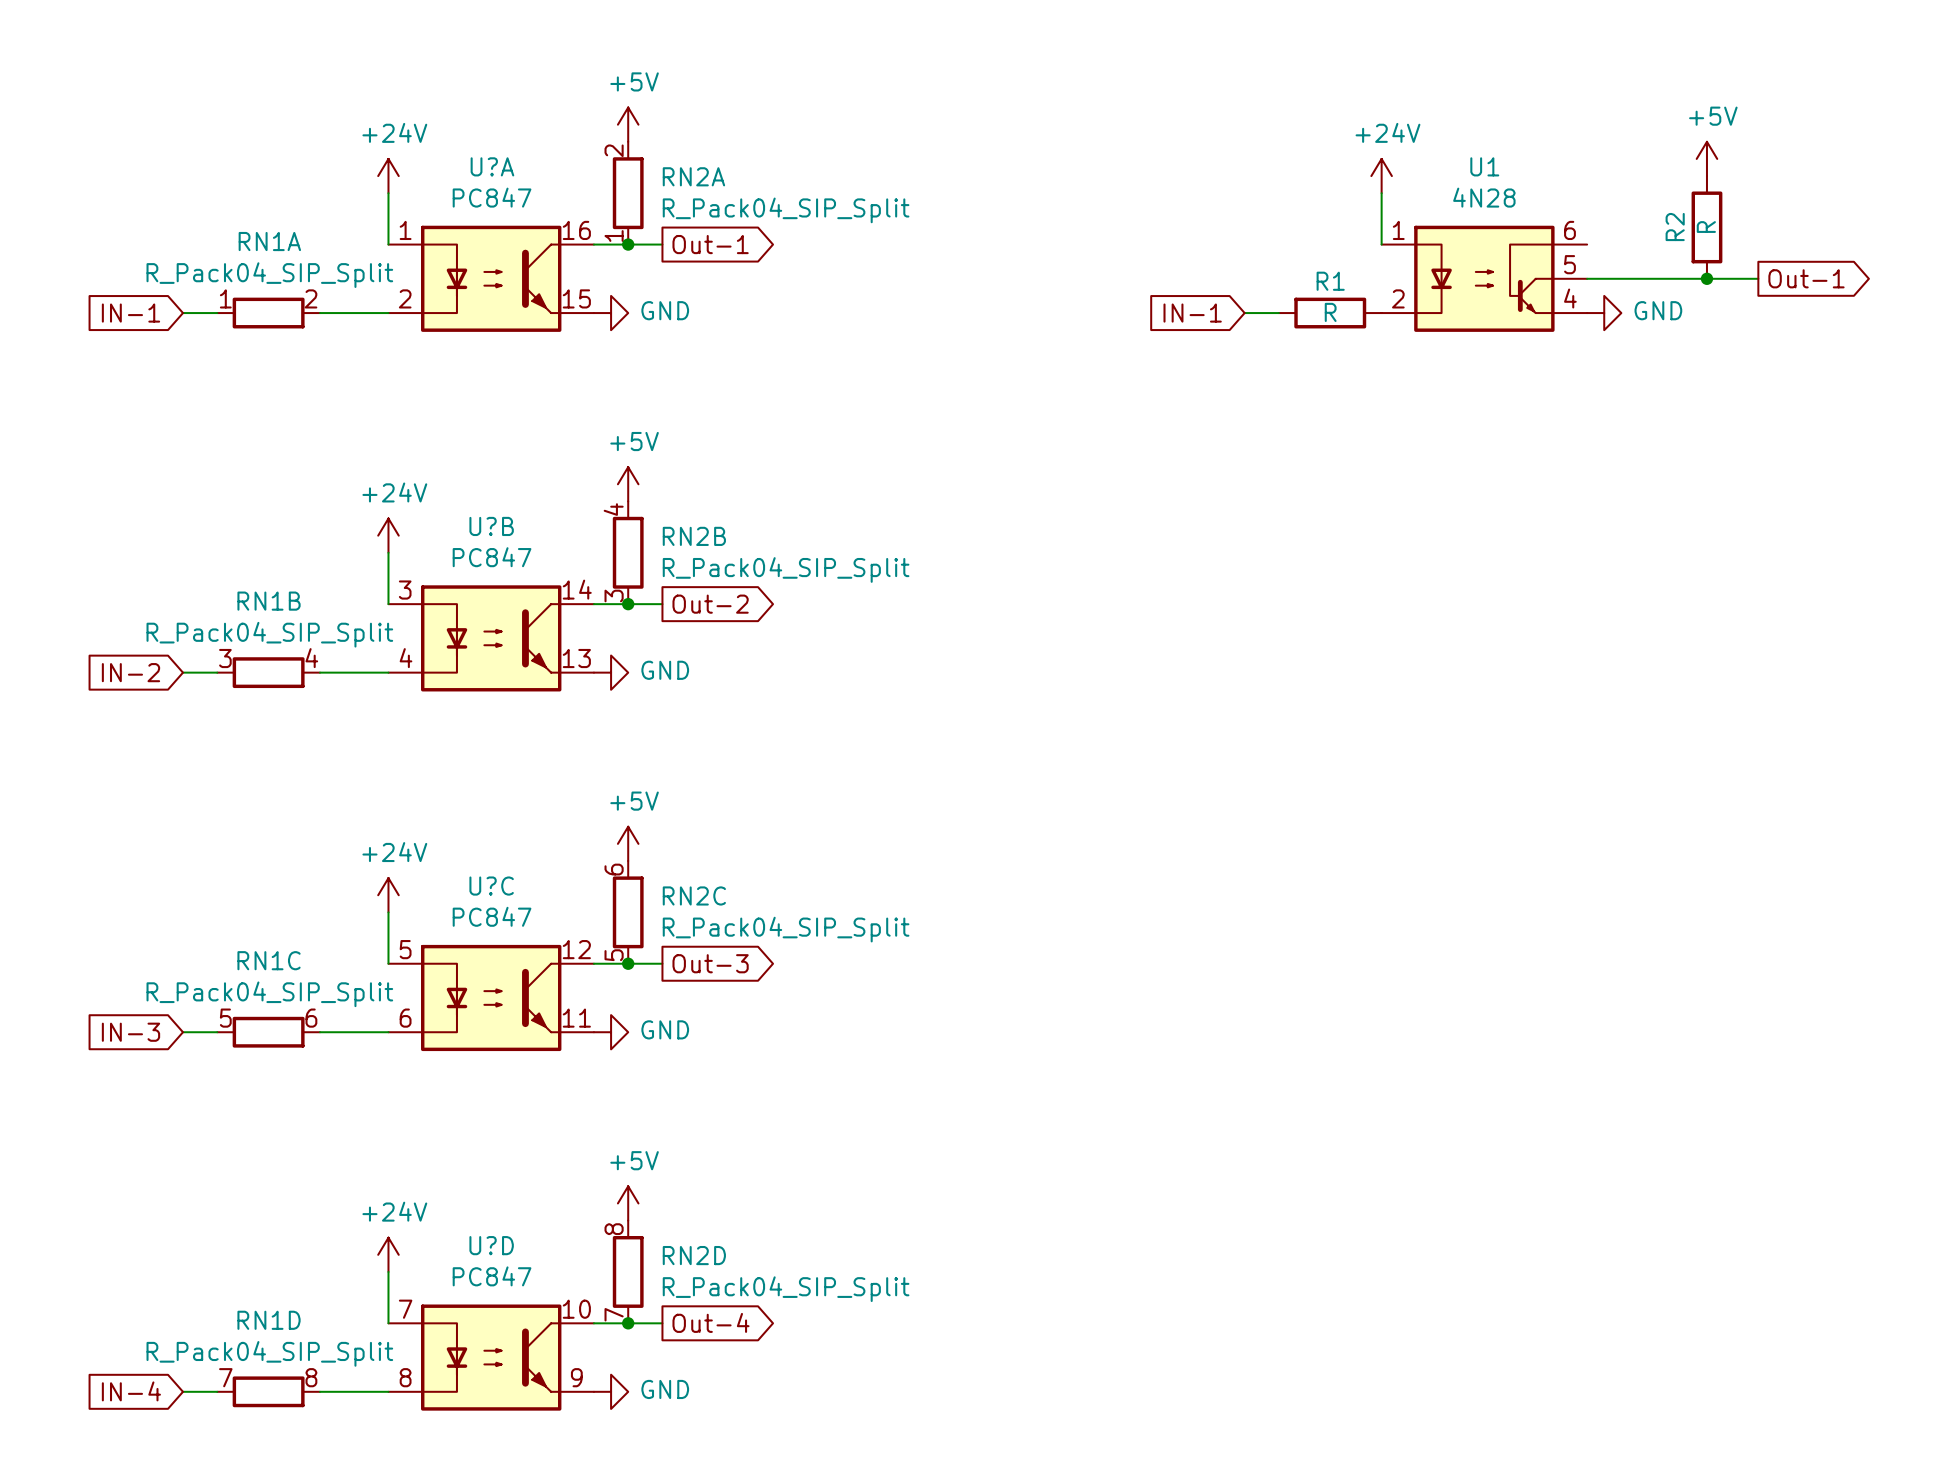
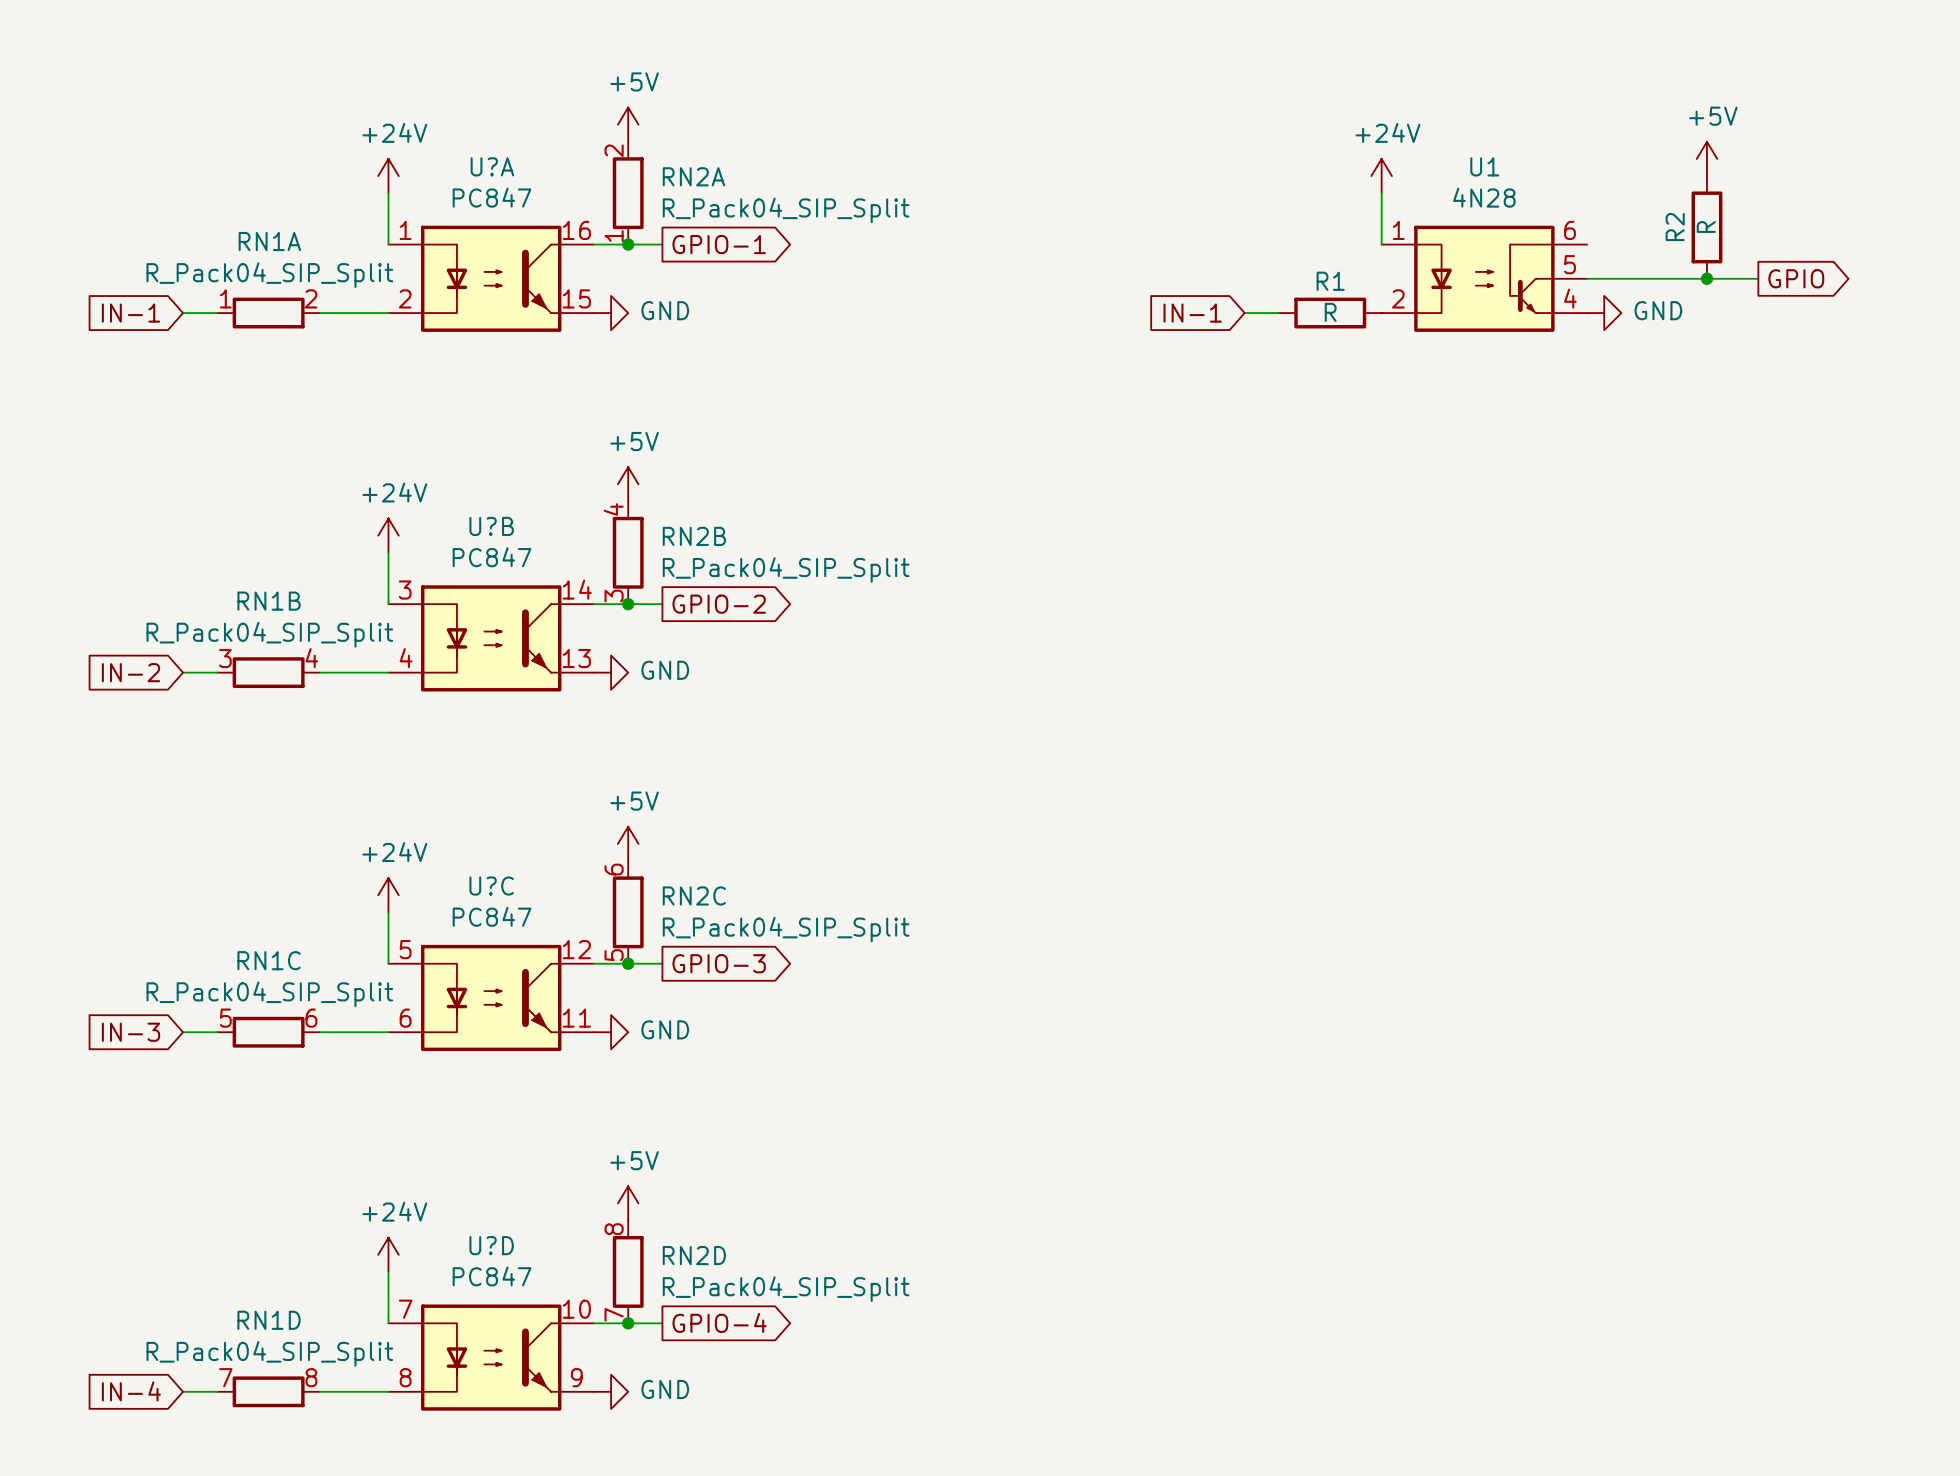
global label: Out-1 (710, 244) -> GPIO-1 (719, 244)
global label: Out-1 (1806, 278) -> GPIO (1796, 278)
global label: Out-2 (710, 604) -> GPIO-2 (719, 604)
global label: Out-3 (710, 963) -> GPIO-3 (719, 963)
global label: Out-4 (710, 1322) -> GPIO-4 (719, 1322)

